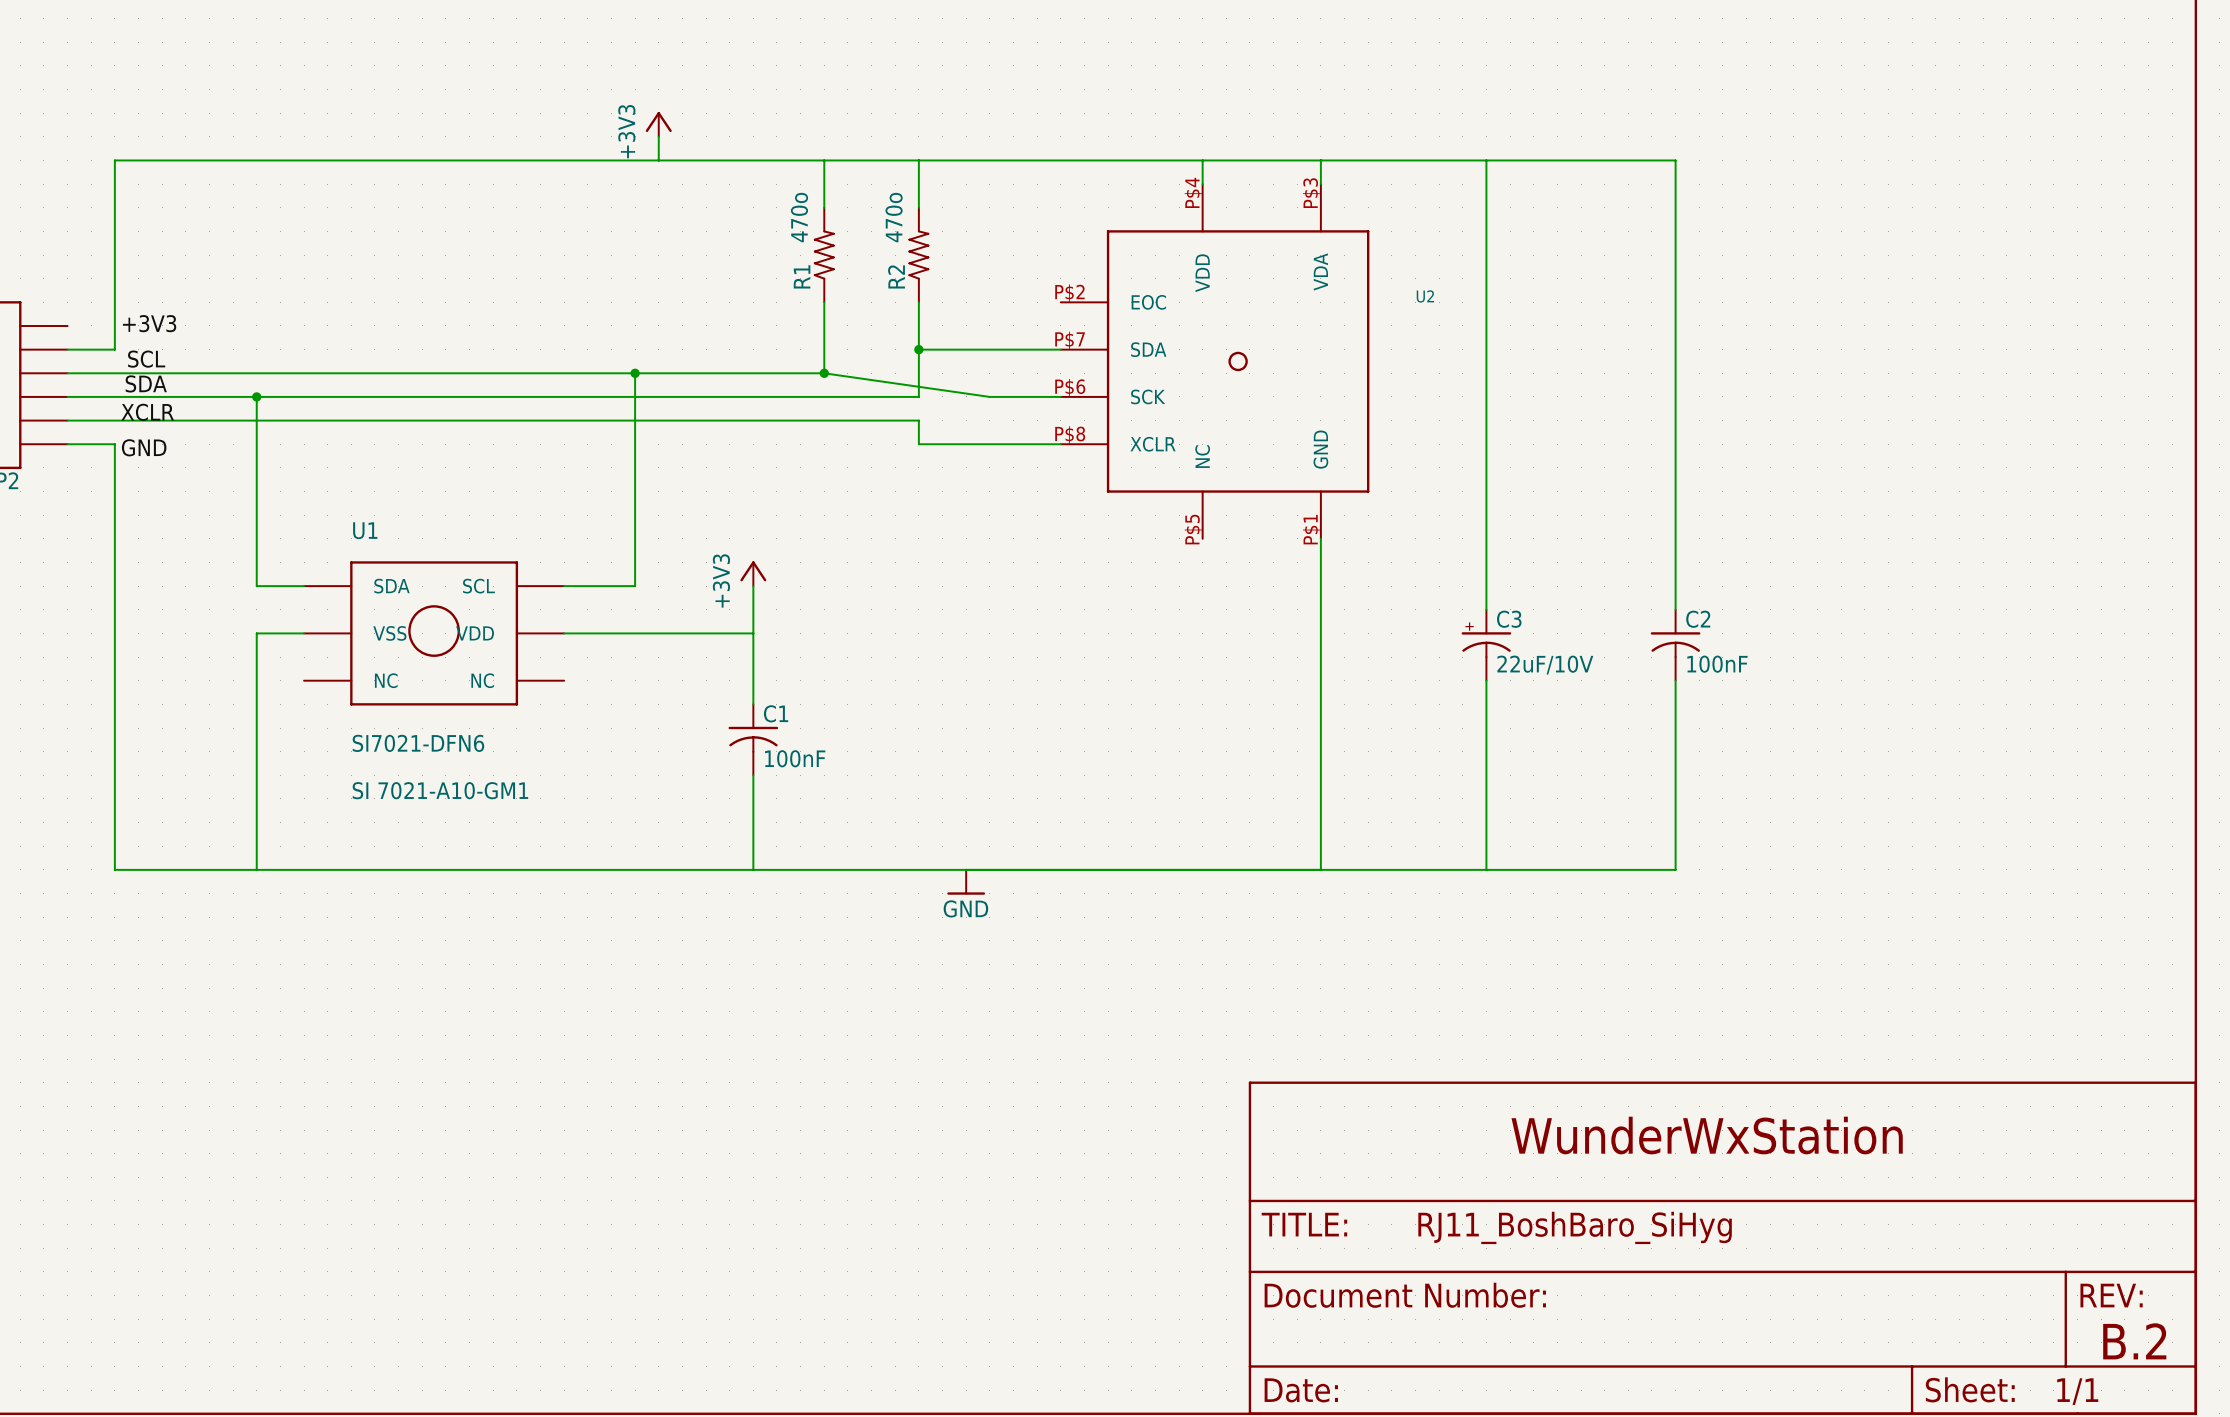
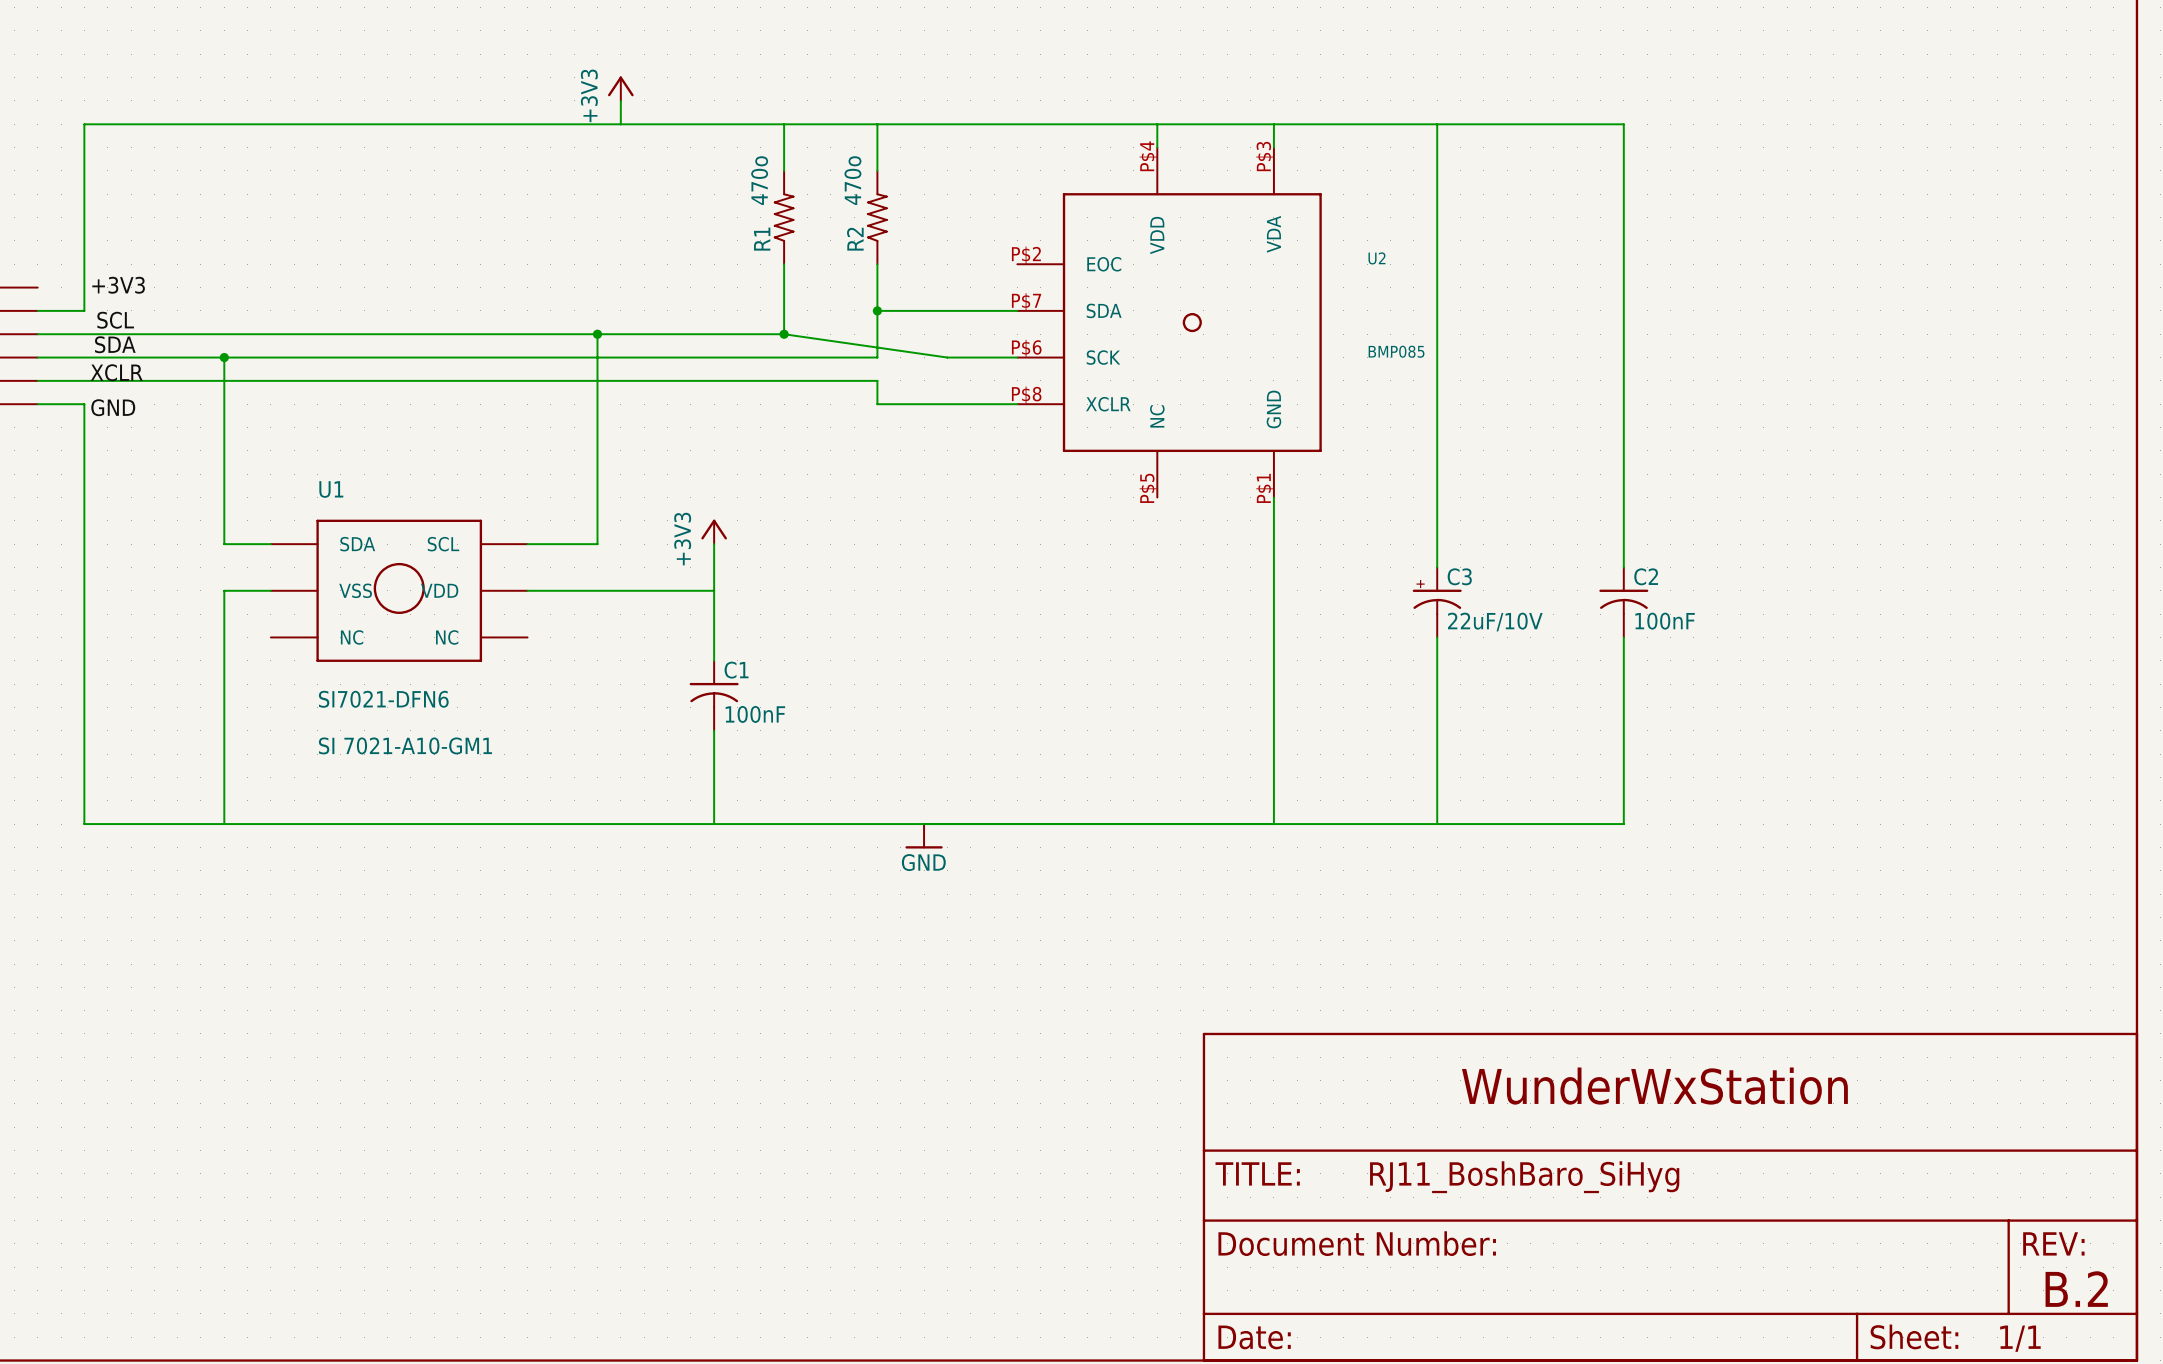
U2 value: none -> BMP085 (1396, 351)

